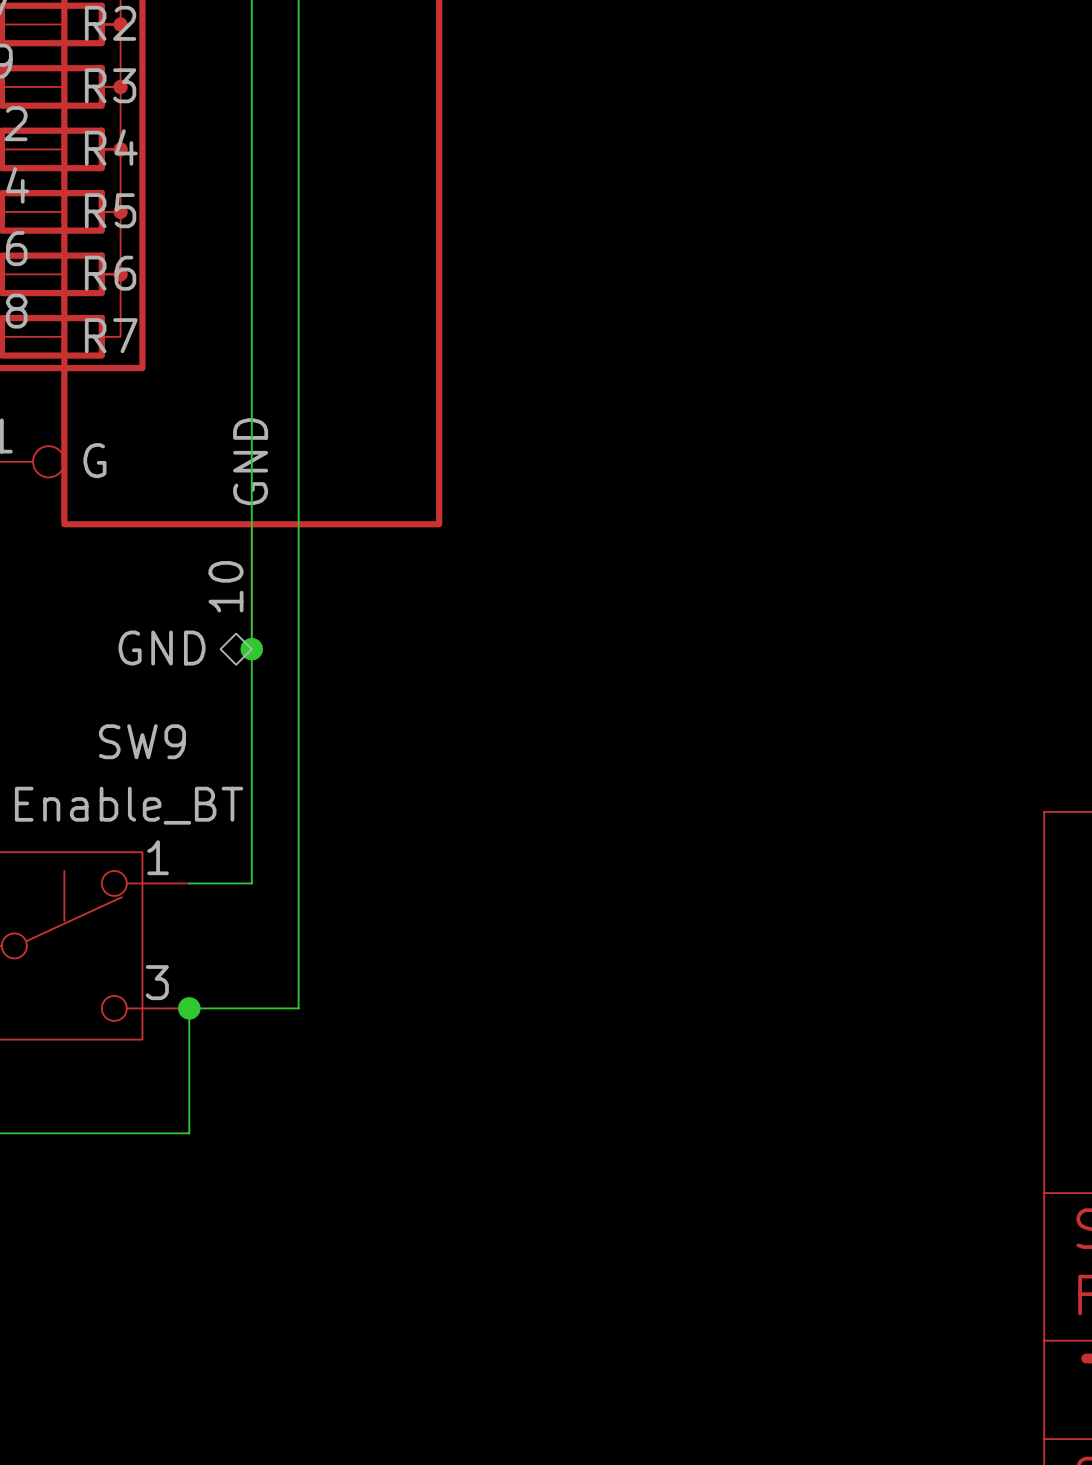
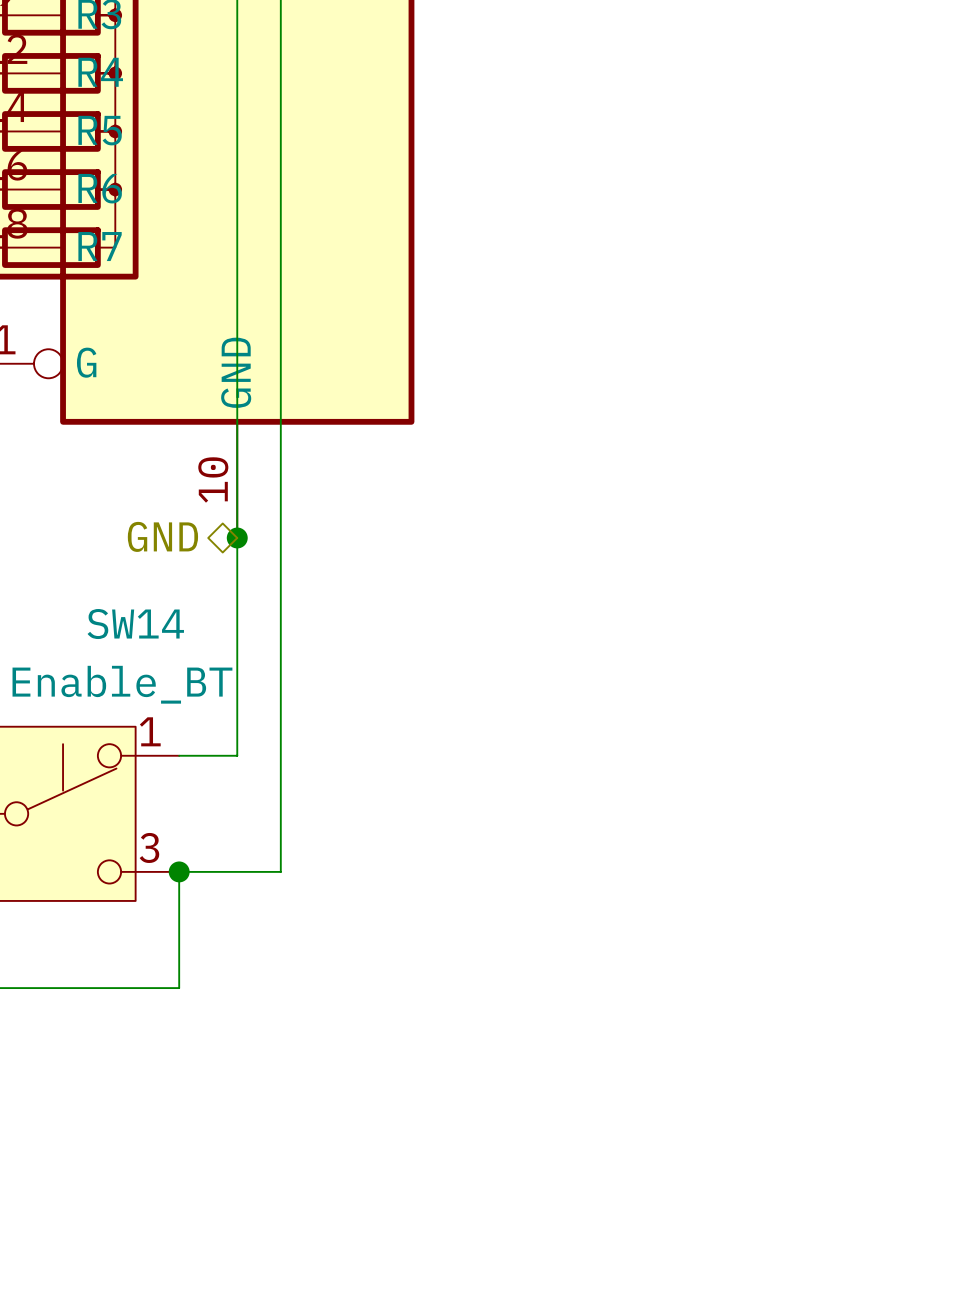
SW9 name: SW9 (142, 741) -> SW14 (135, 624)

